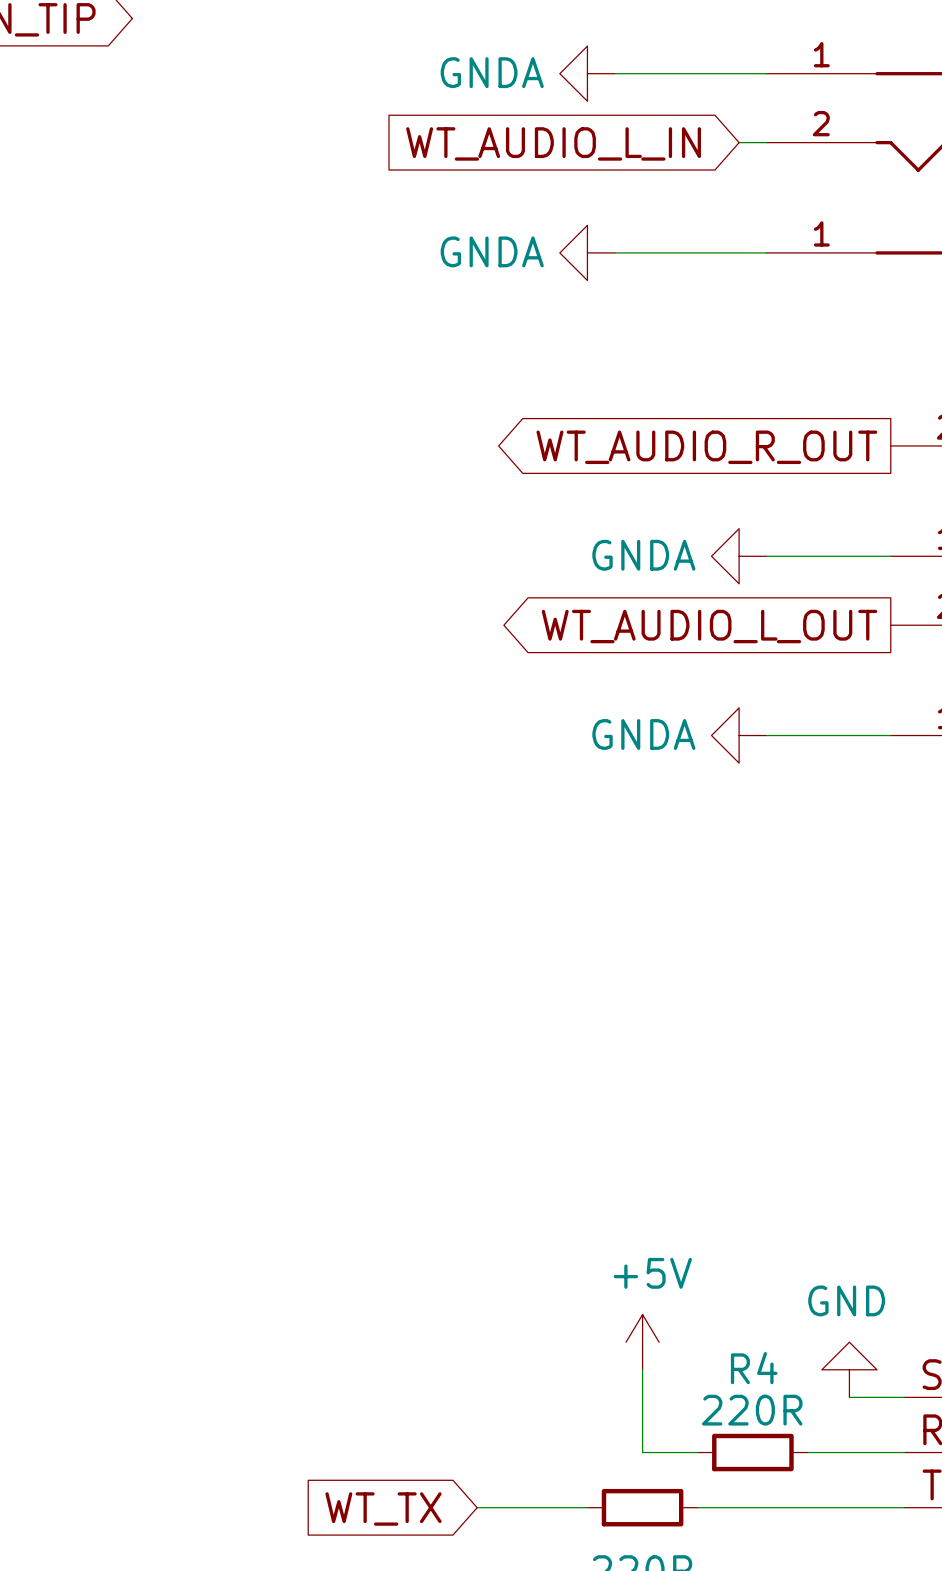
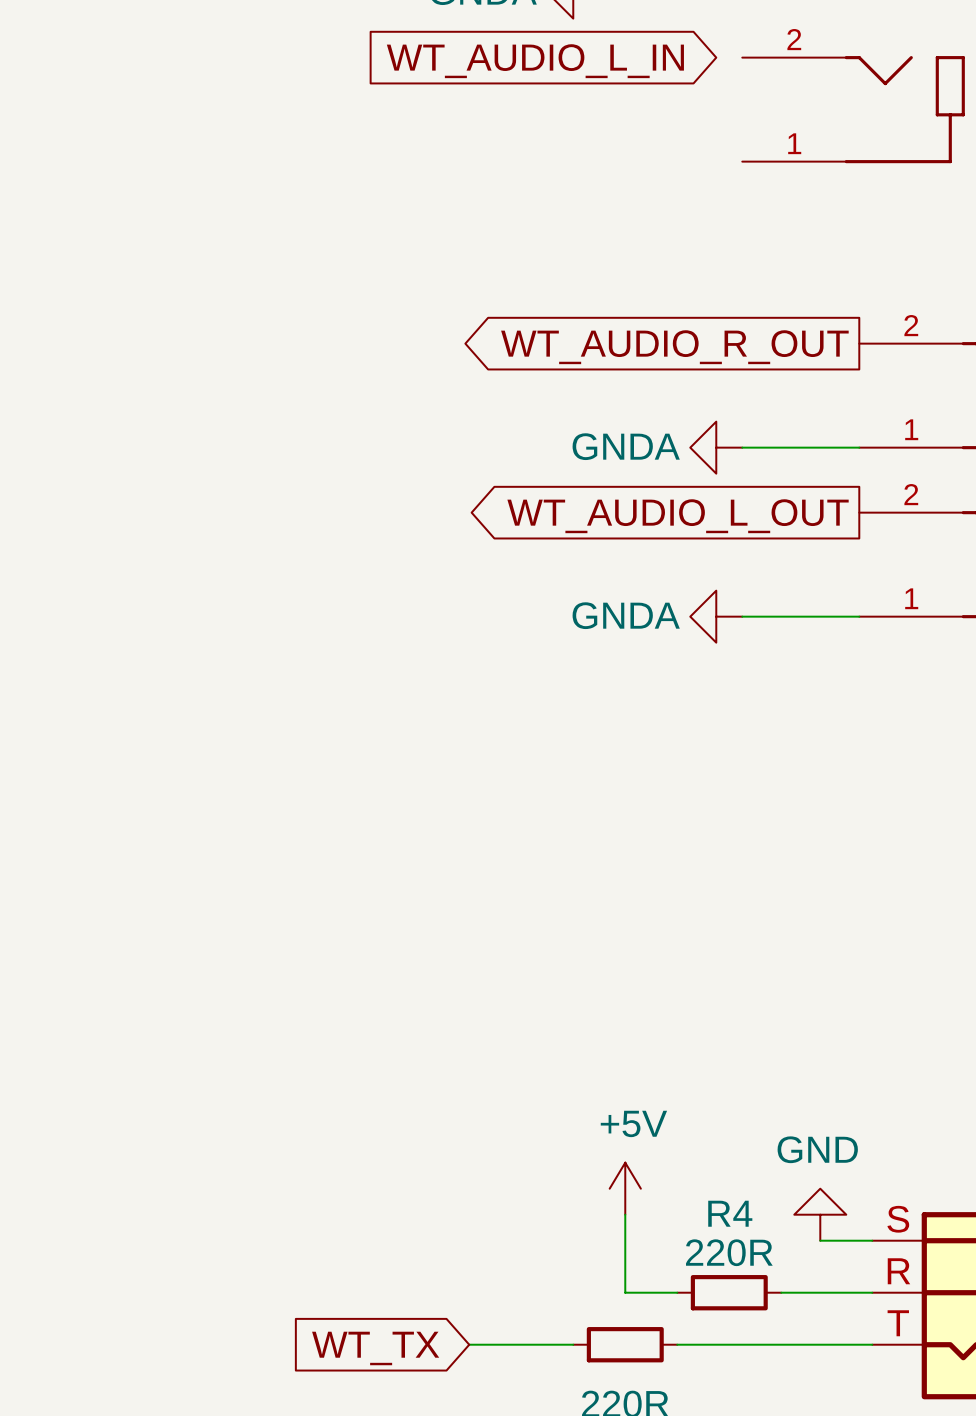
wire: (739, 142) (766, 142) -> none
power symbol: GNDA (587, 252) -> none
wire: (615, 252) (766, 252) -> none

